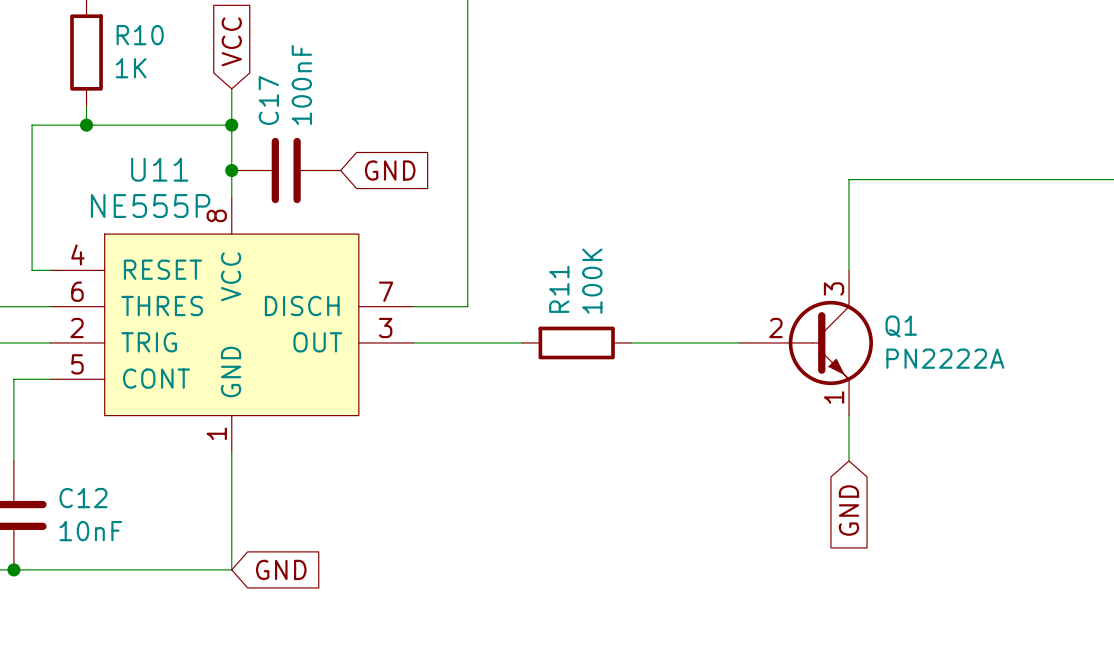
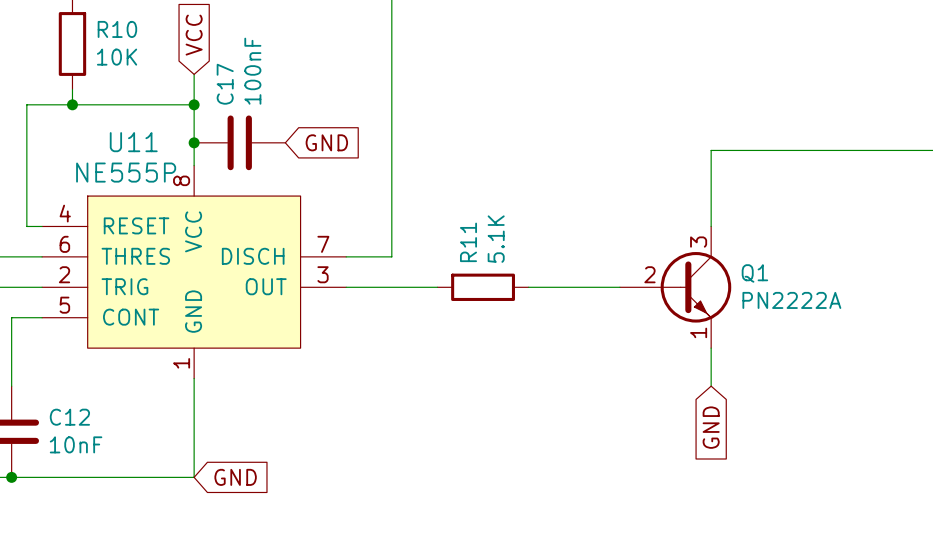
R10 value: 1K (131, 68) -> 10K (117, 57)
R11 value: 100K (592, 281) -> 5.1K (496, 239)

